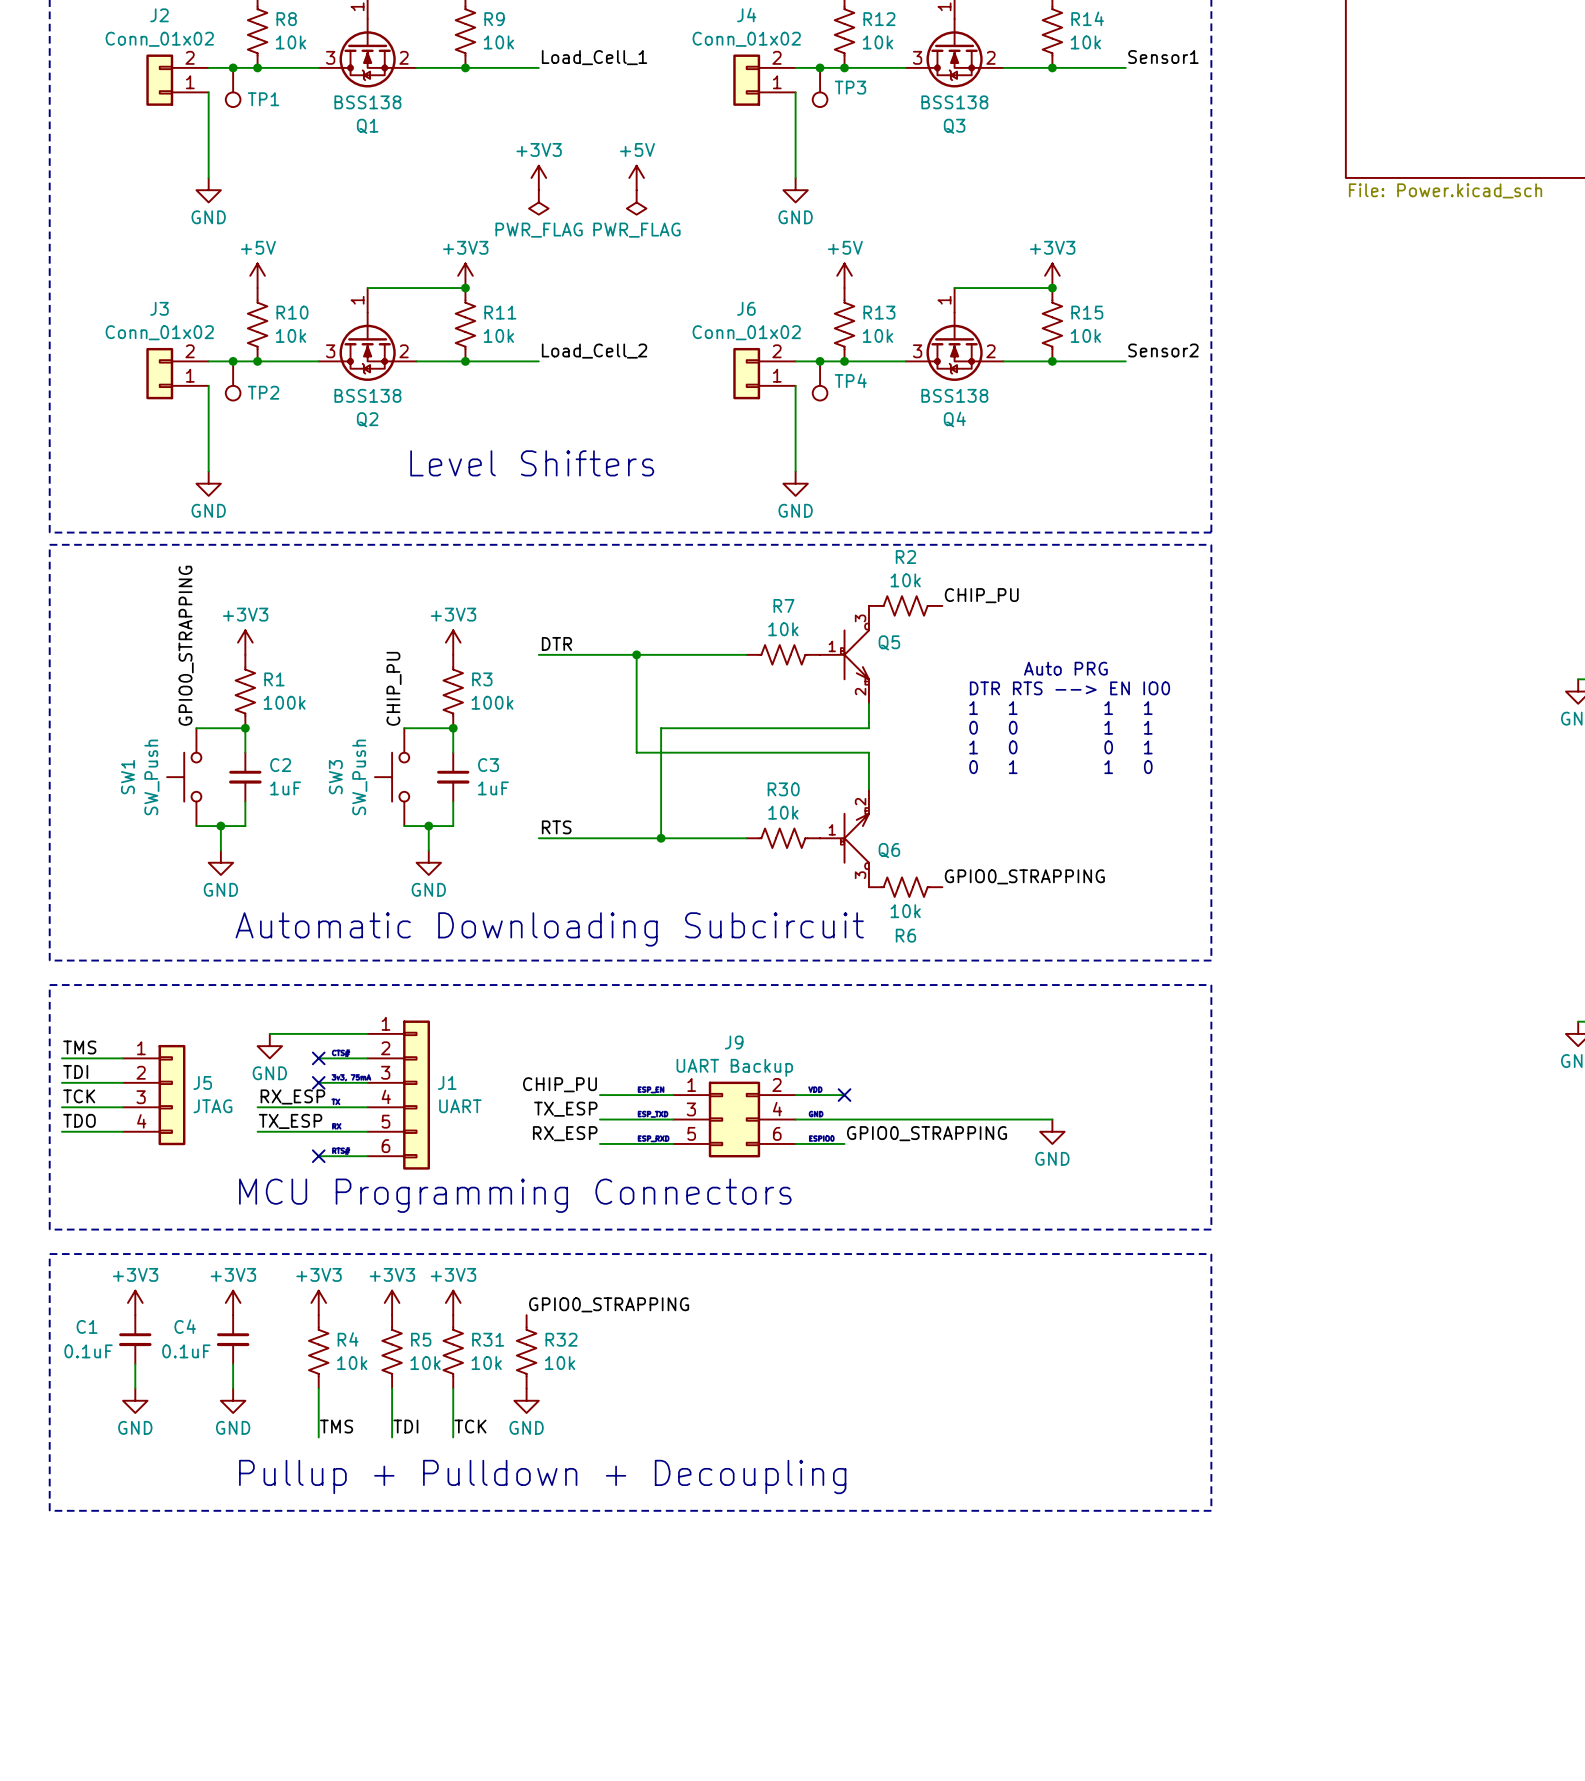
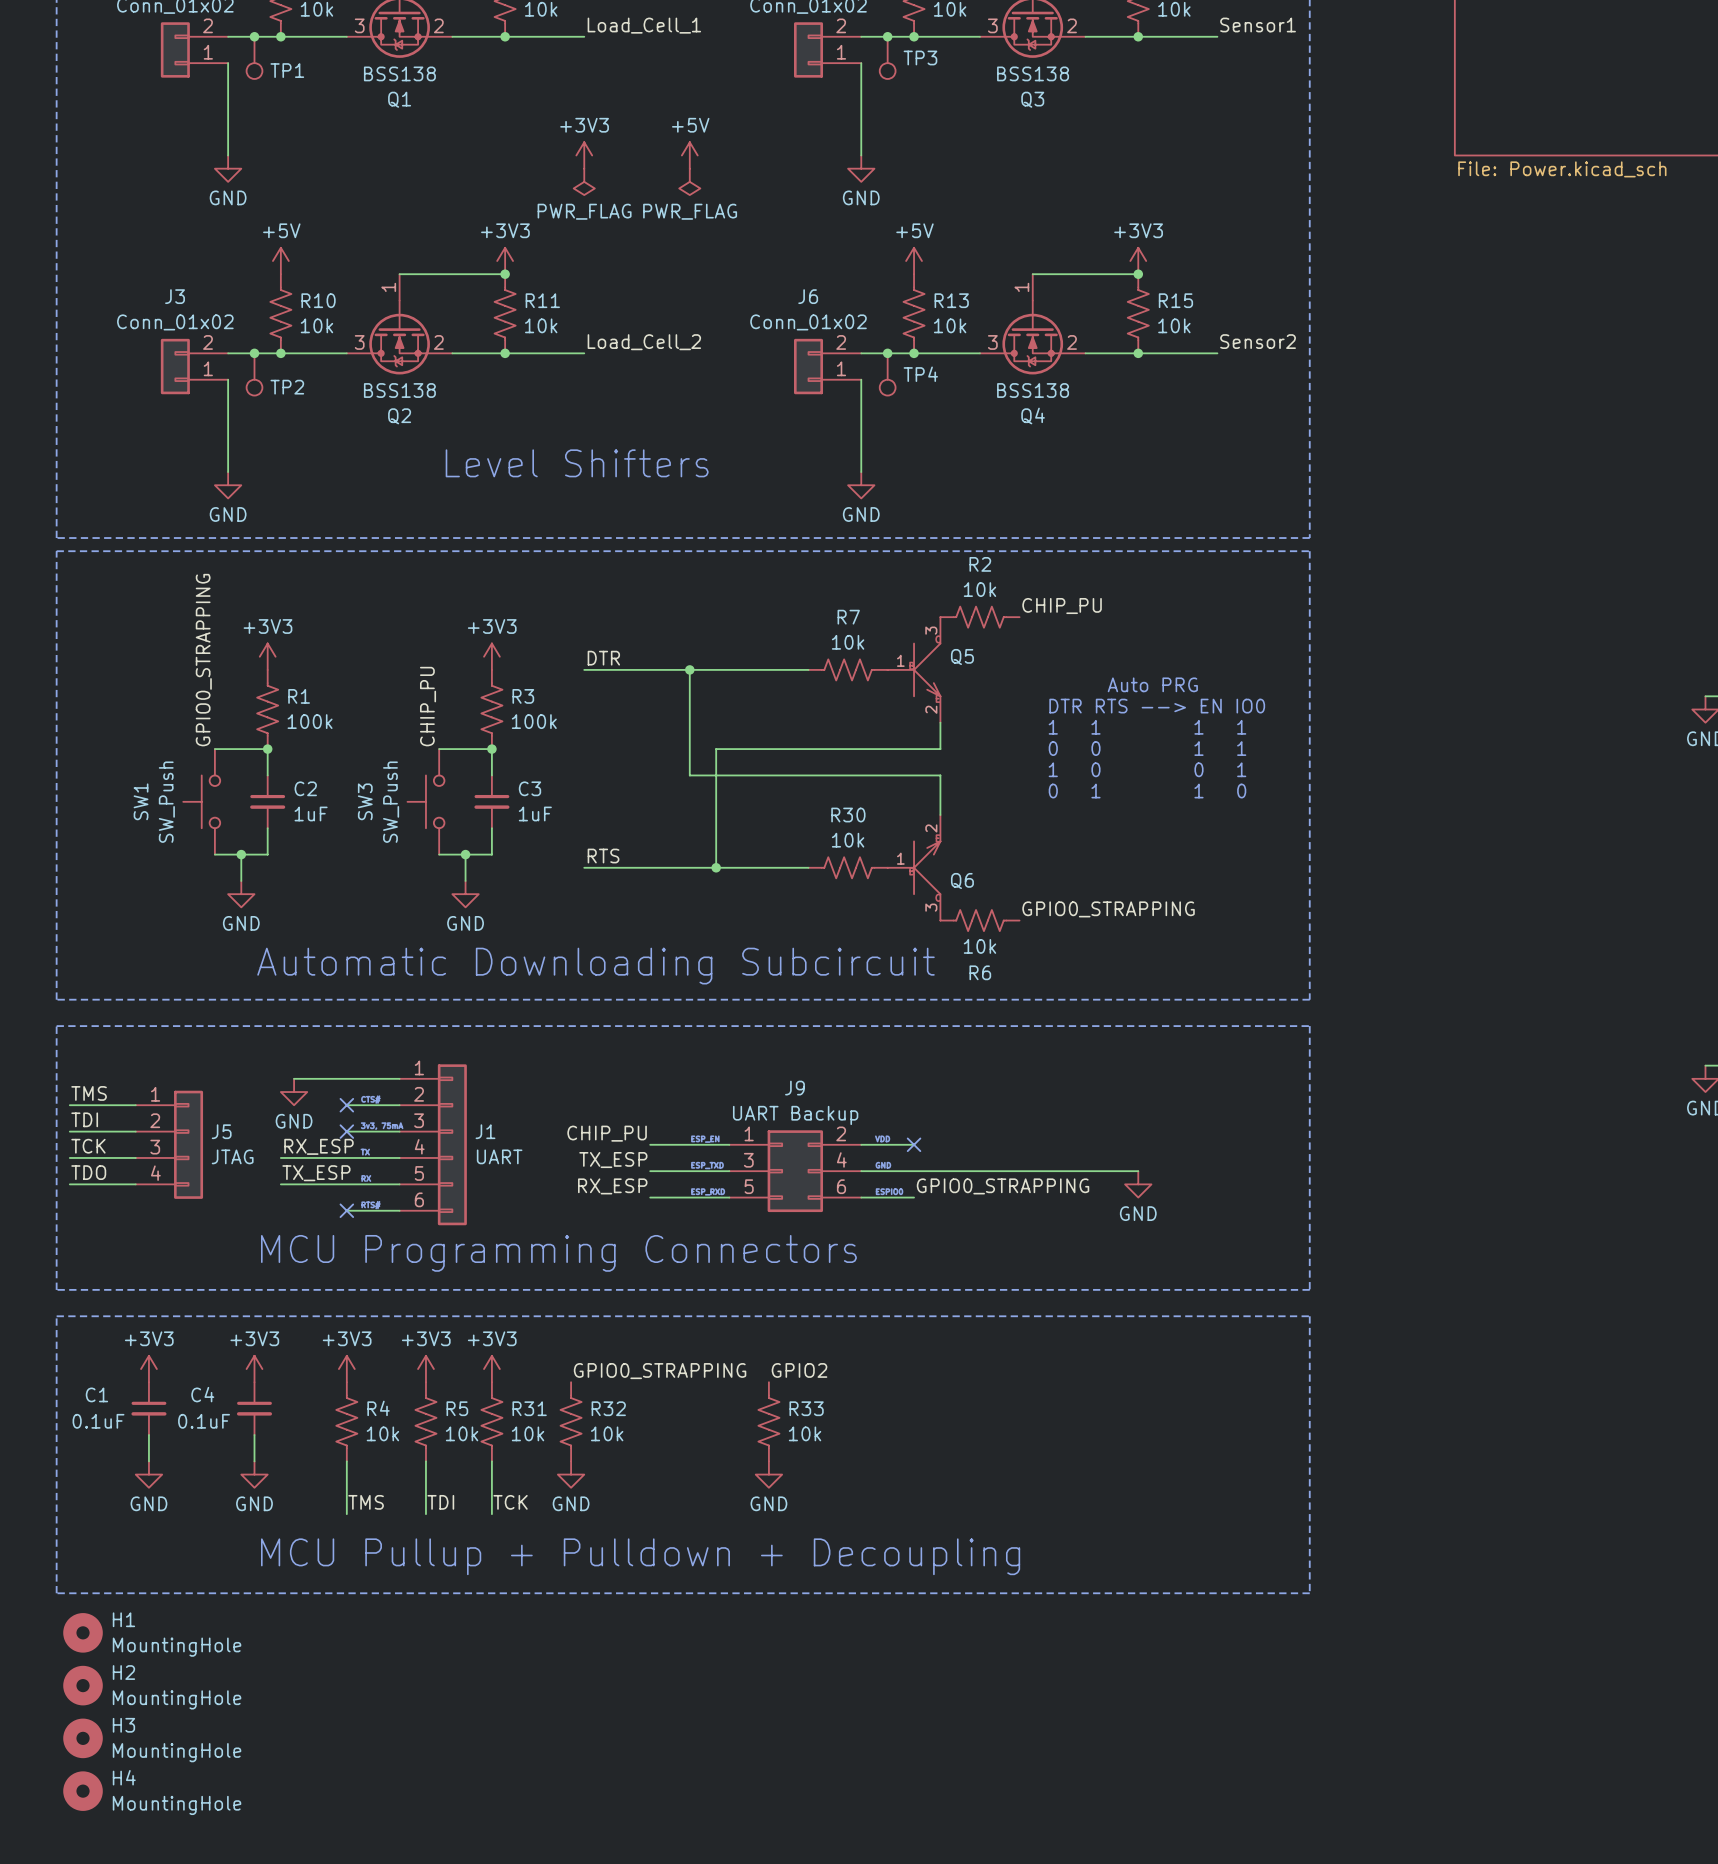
label: none -> GPIO2 (799, 1370)
R33: none -> 10k (768, 1421)
power symbol: none -> GND (768, 1474)
text: Pullup + Pulldown + Decoupling (542, 1476) -> MCU Pullup + Pulldown + Decoupling (640, 1556)
H1: none -> MountingHole (83, 1632)
H2: none -> MountingHole (83, 1685)
H3: none -> MountingHole (83, 1738)
H4: none -> MountingHole (83, 1791)

